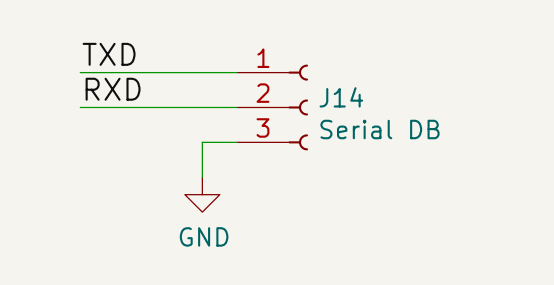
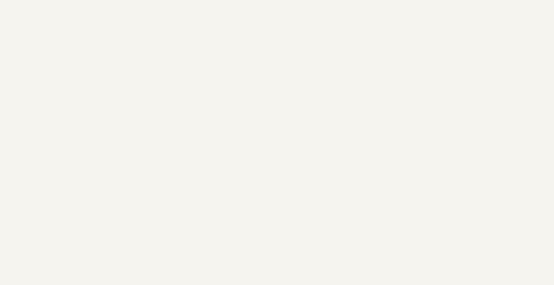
label: TXD (109, 54) -> none
wire: (80, 72) (237, 72) -> none
label: RXD (113, 89) -> none
wire: (80, 107) (237, 107) -> none
J14: Serial DB (272, 107) -> none
wire: (237, 142) (202, 142) (202, 177) -> none
power symbol: GND (202, 194) -> none

